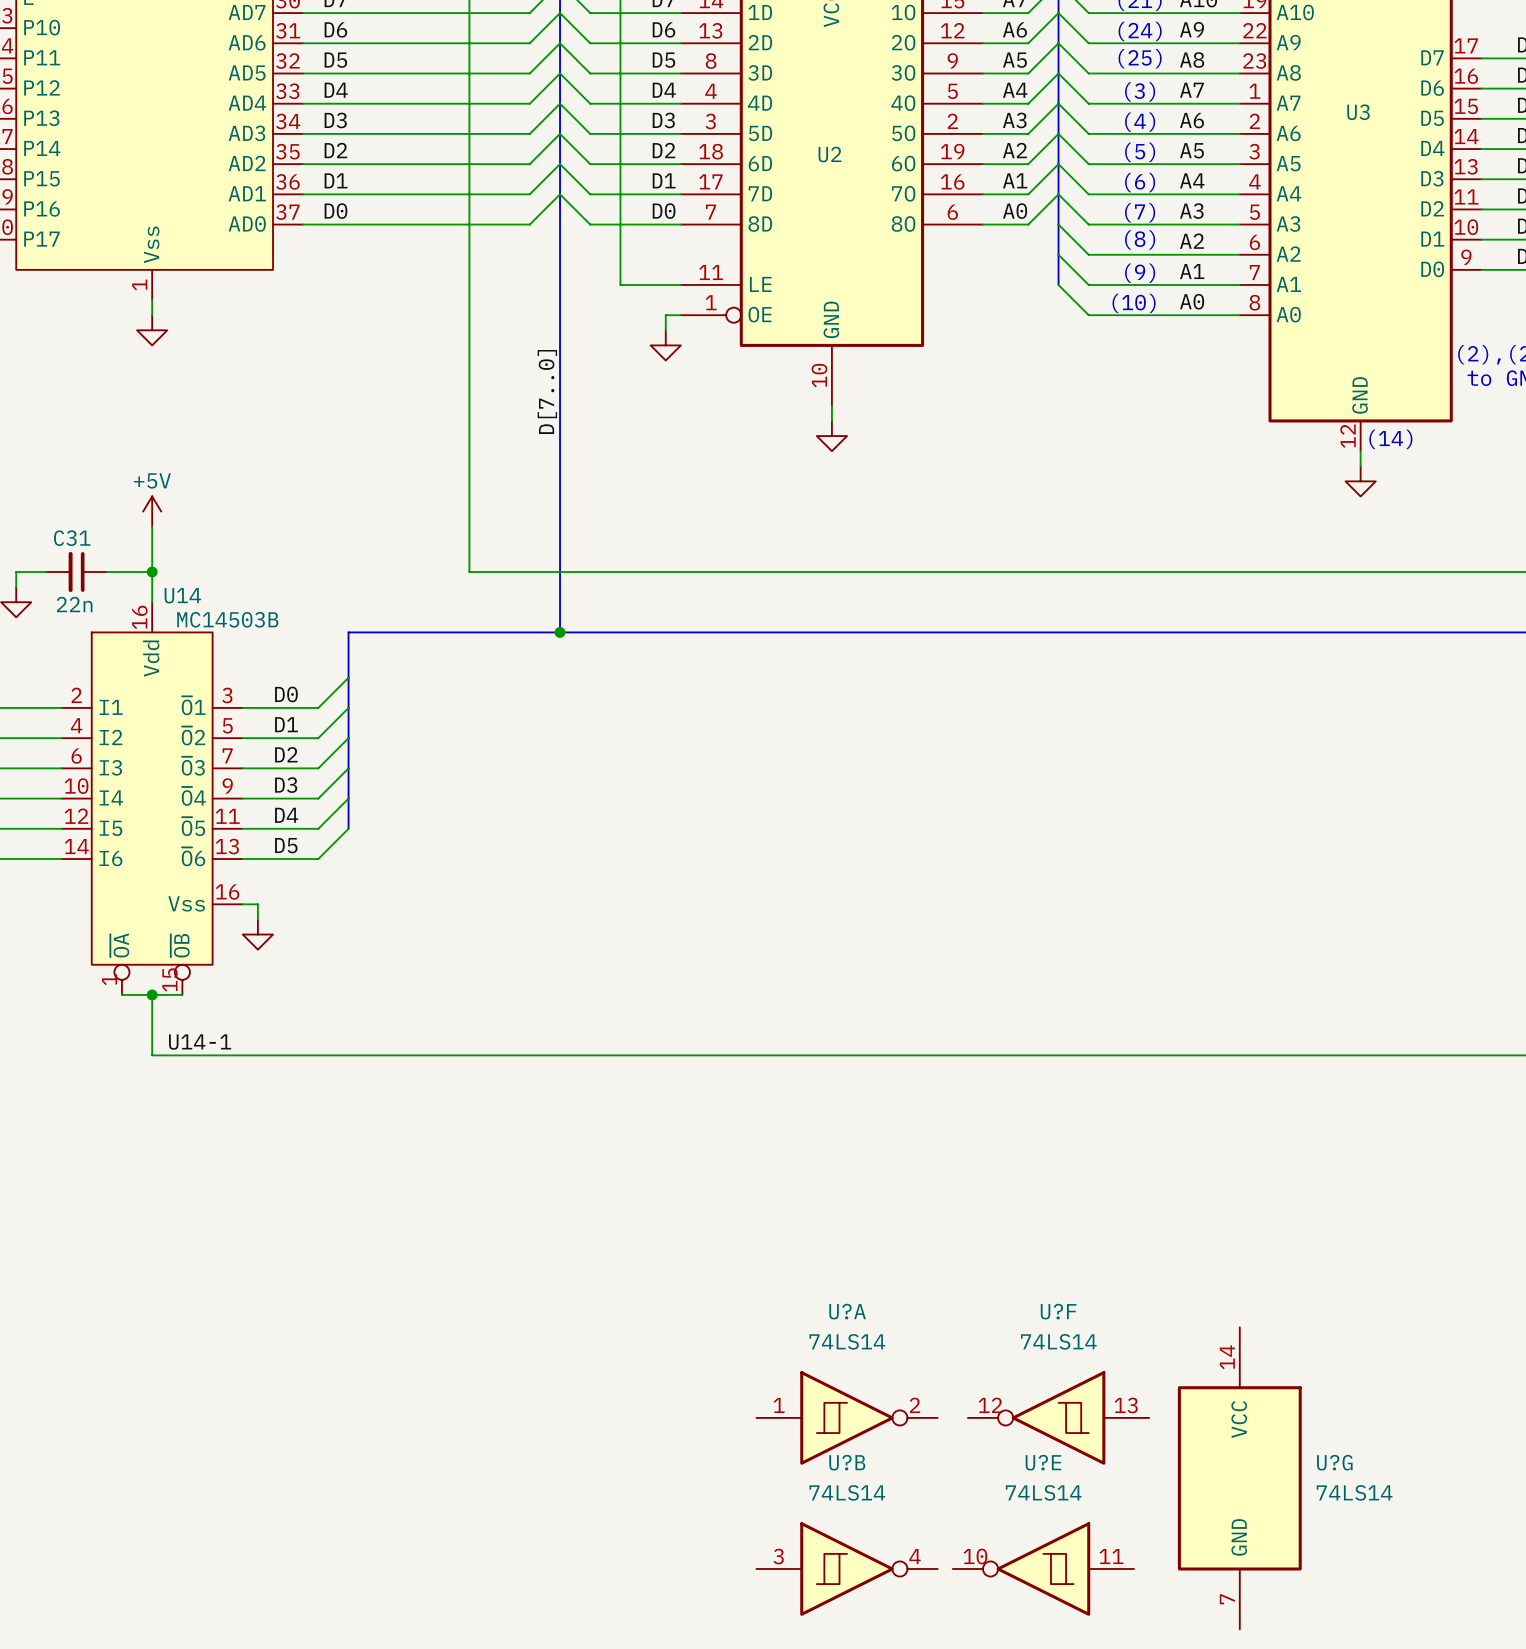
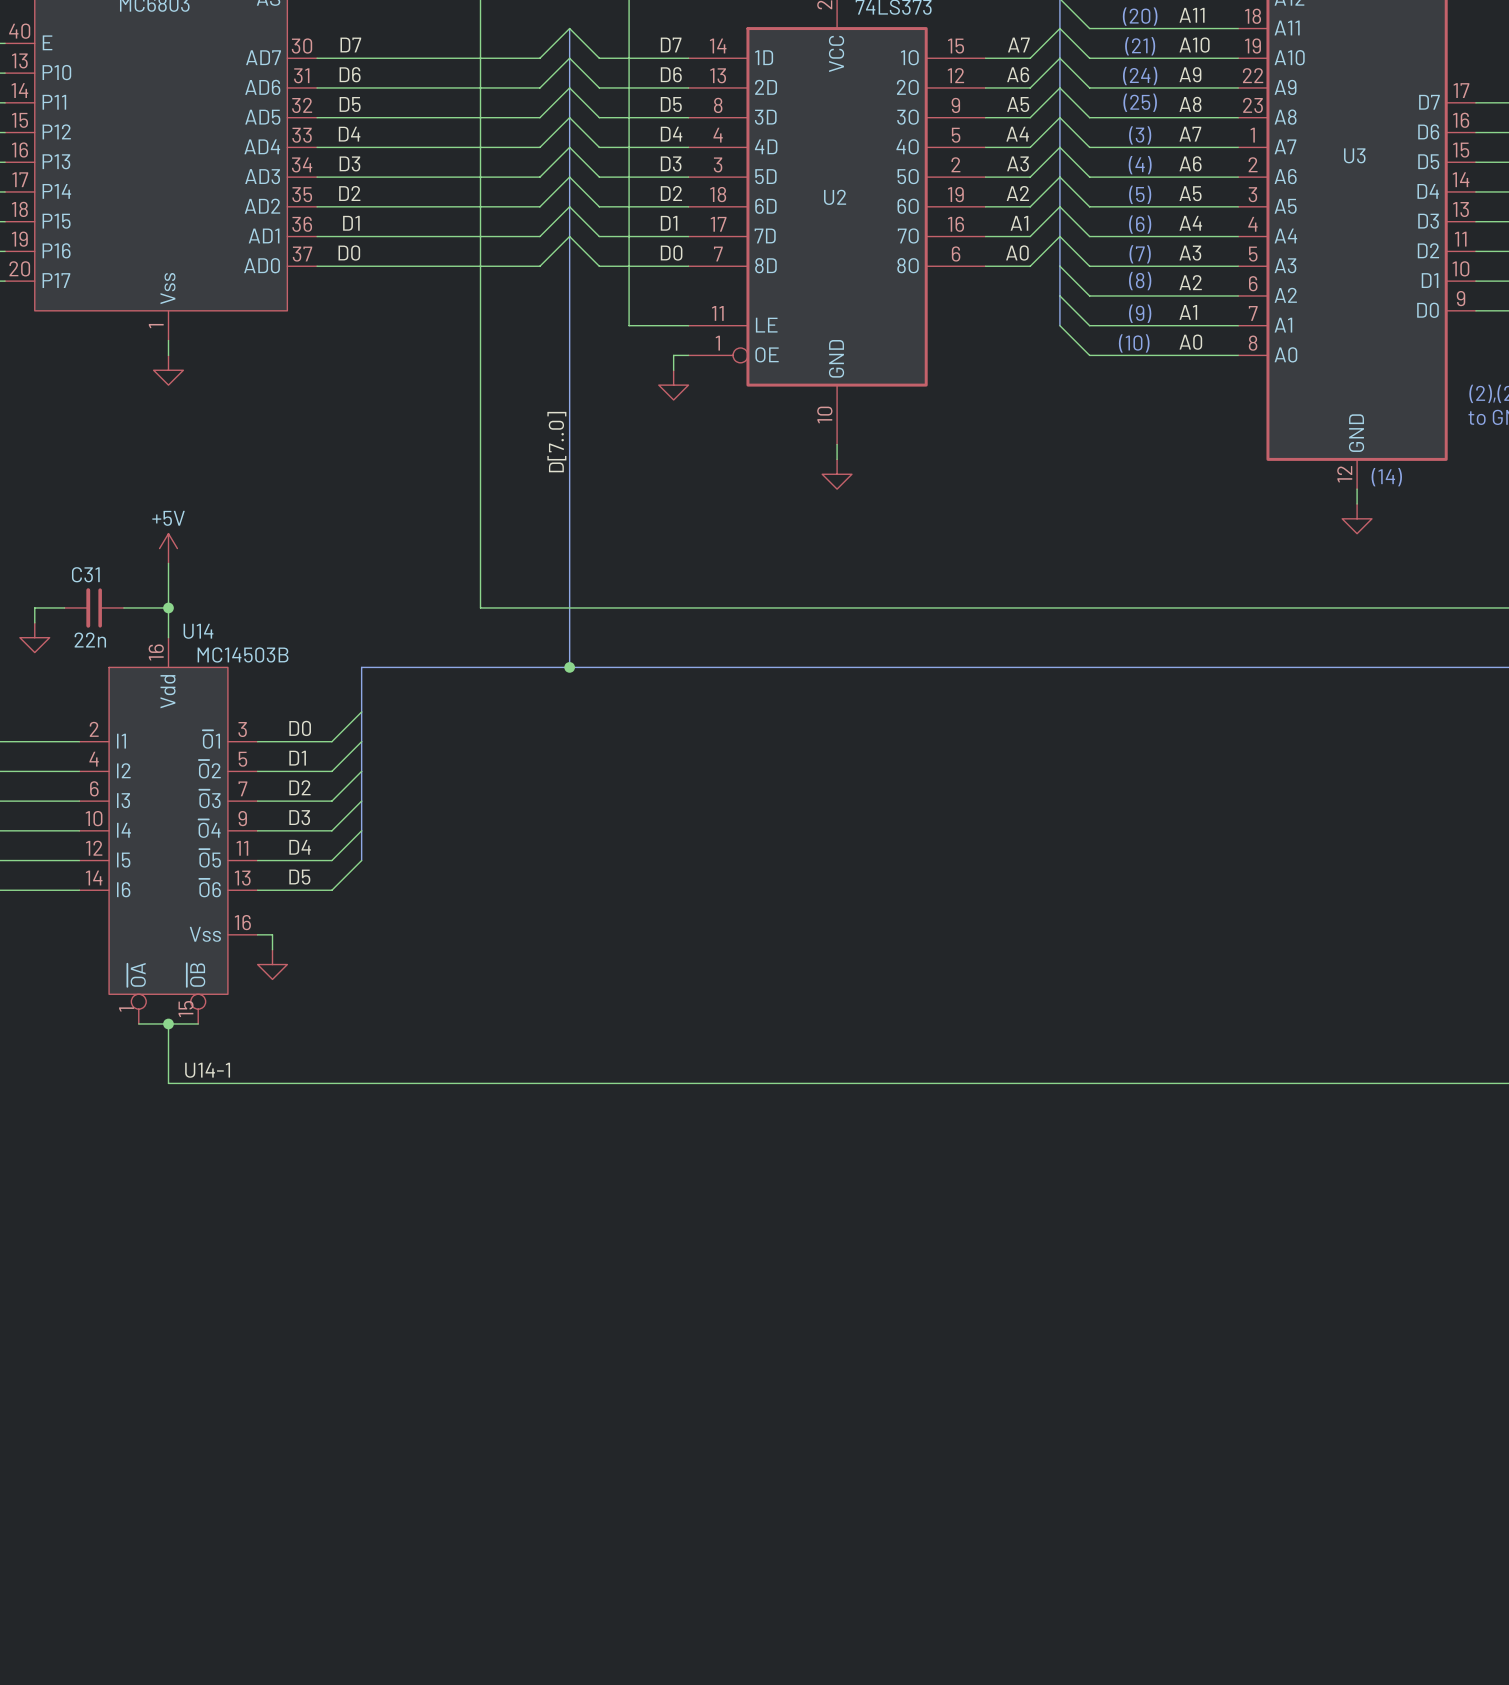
U?A: 74LS14 (847, 1417) -> none
U?F: 74LS14 (1058, 1417) -> none
U?G: 74LS14 (1239, 1478) -> none
U?B: 74LS14 (847, 1568) -> none
U?E: 74LS14 (1043, 1568) -> none

